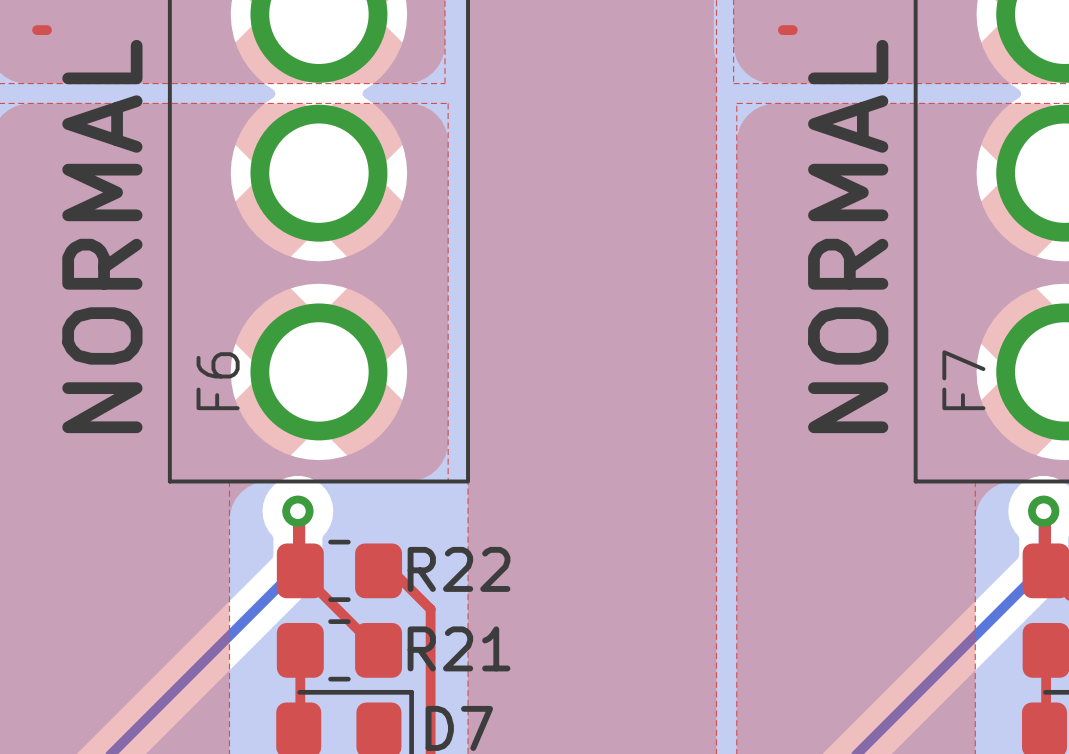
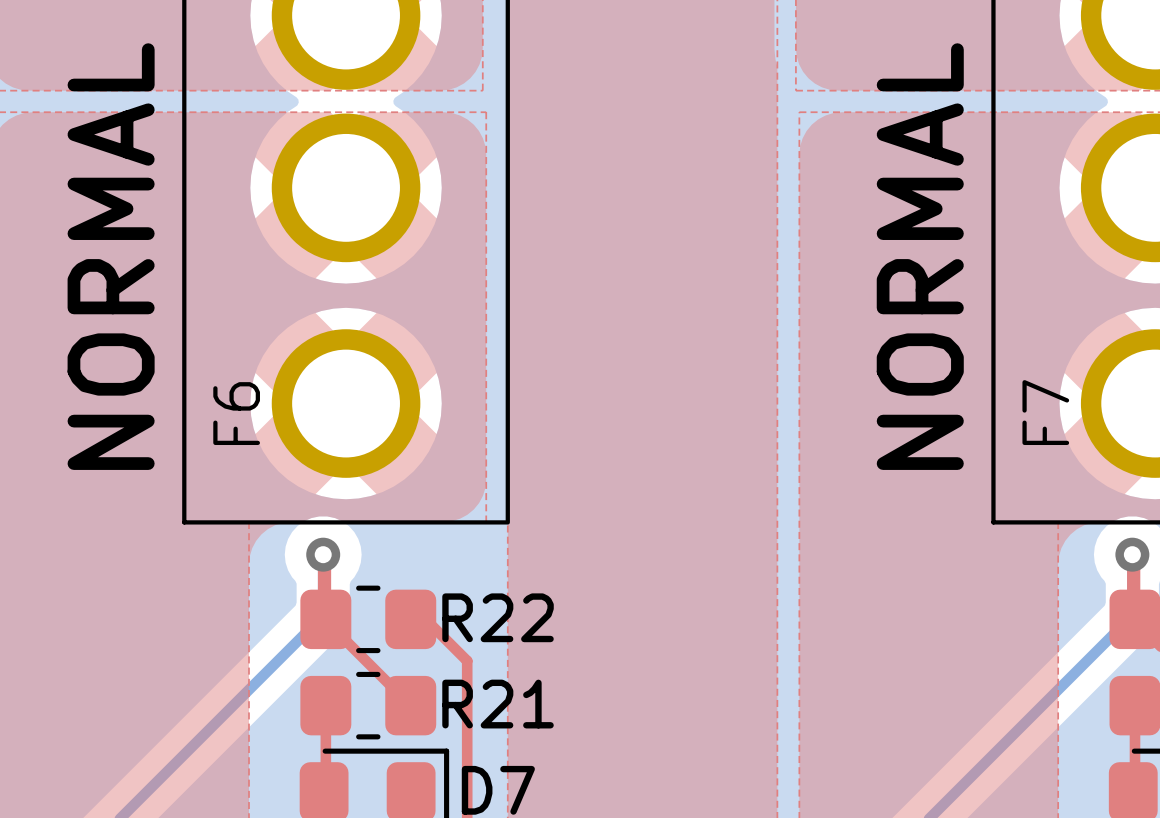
top track: (37, 30) (47, 30) -> none
top track: (782, 30) (792, 30) -> none

